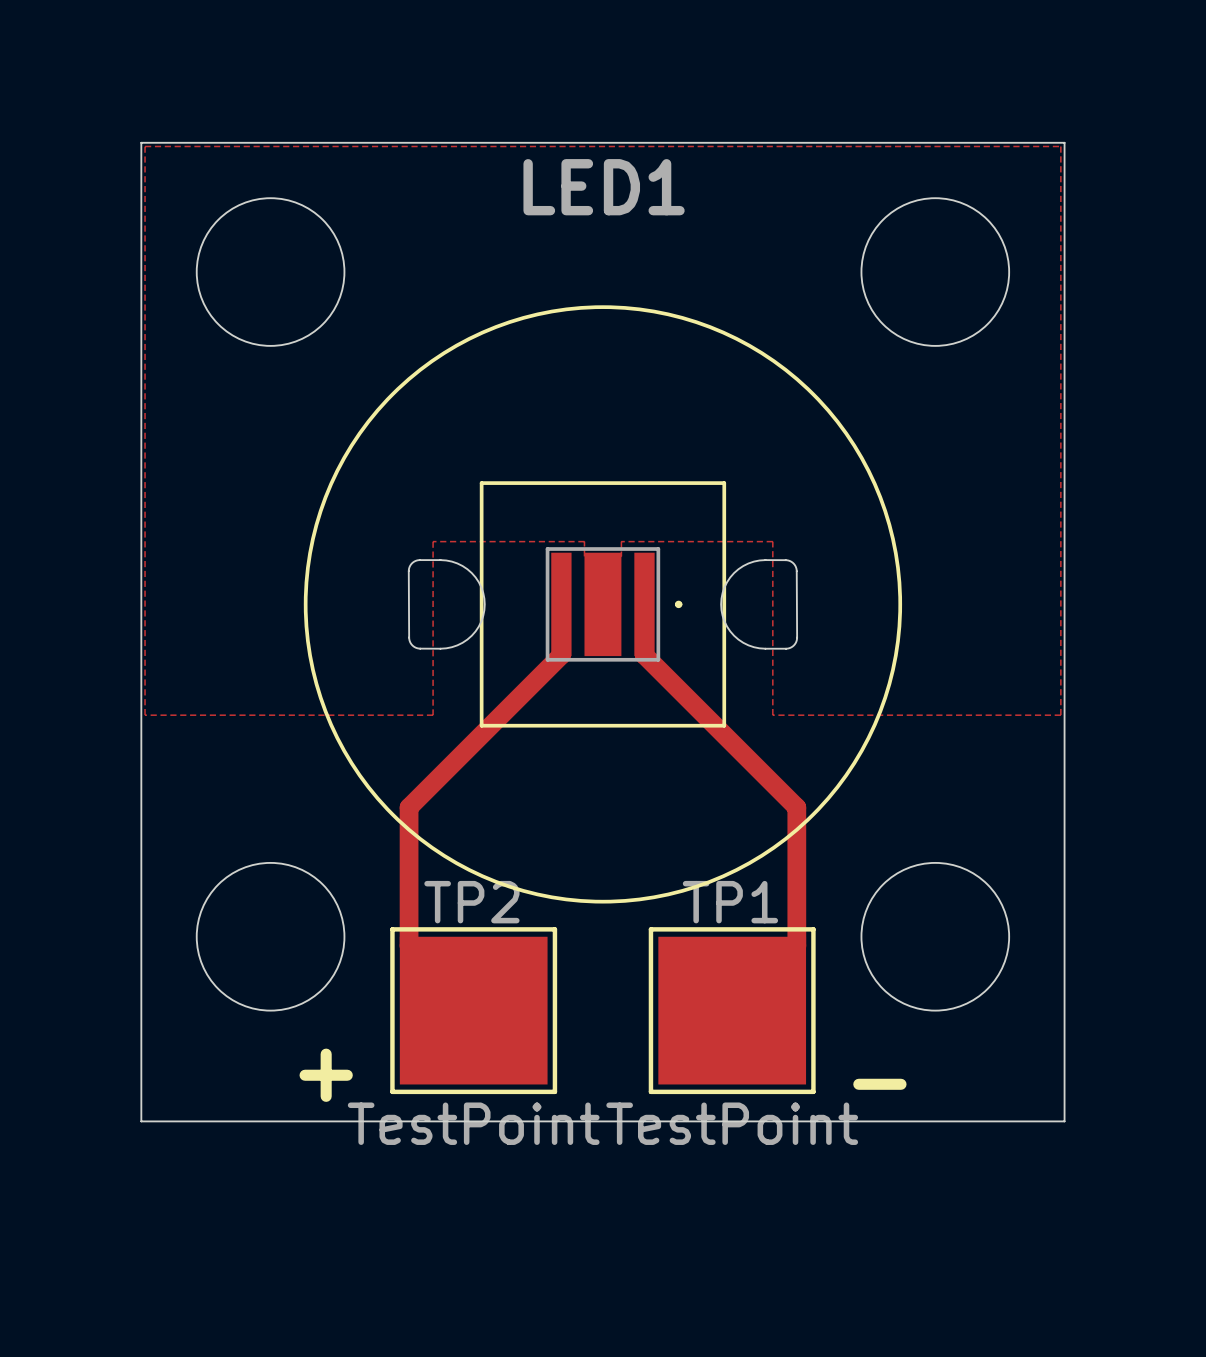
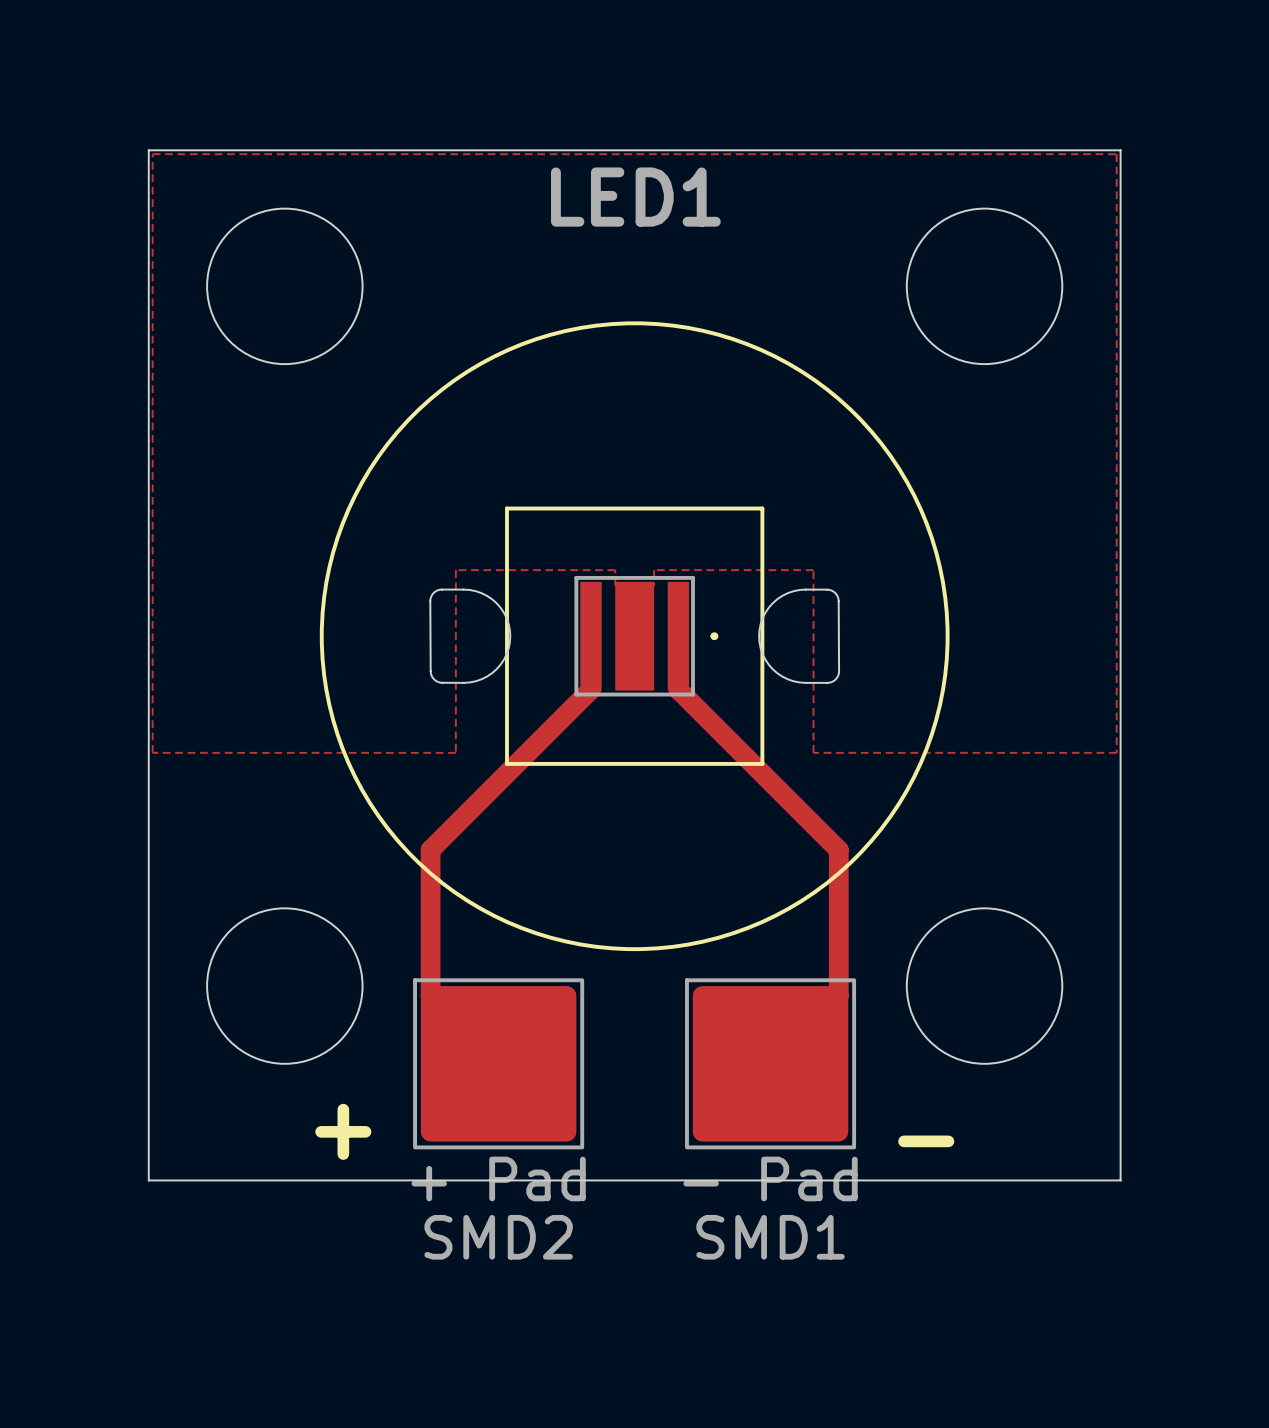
TP2: TestPoint (473, 1010) -> none
SMD2: none -> + Pad (498, 1063)
TP1: TestPoint (732, 1010) -> none
SMD1: none -> - Pad (770, 1063)

